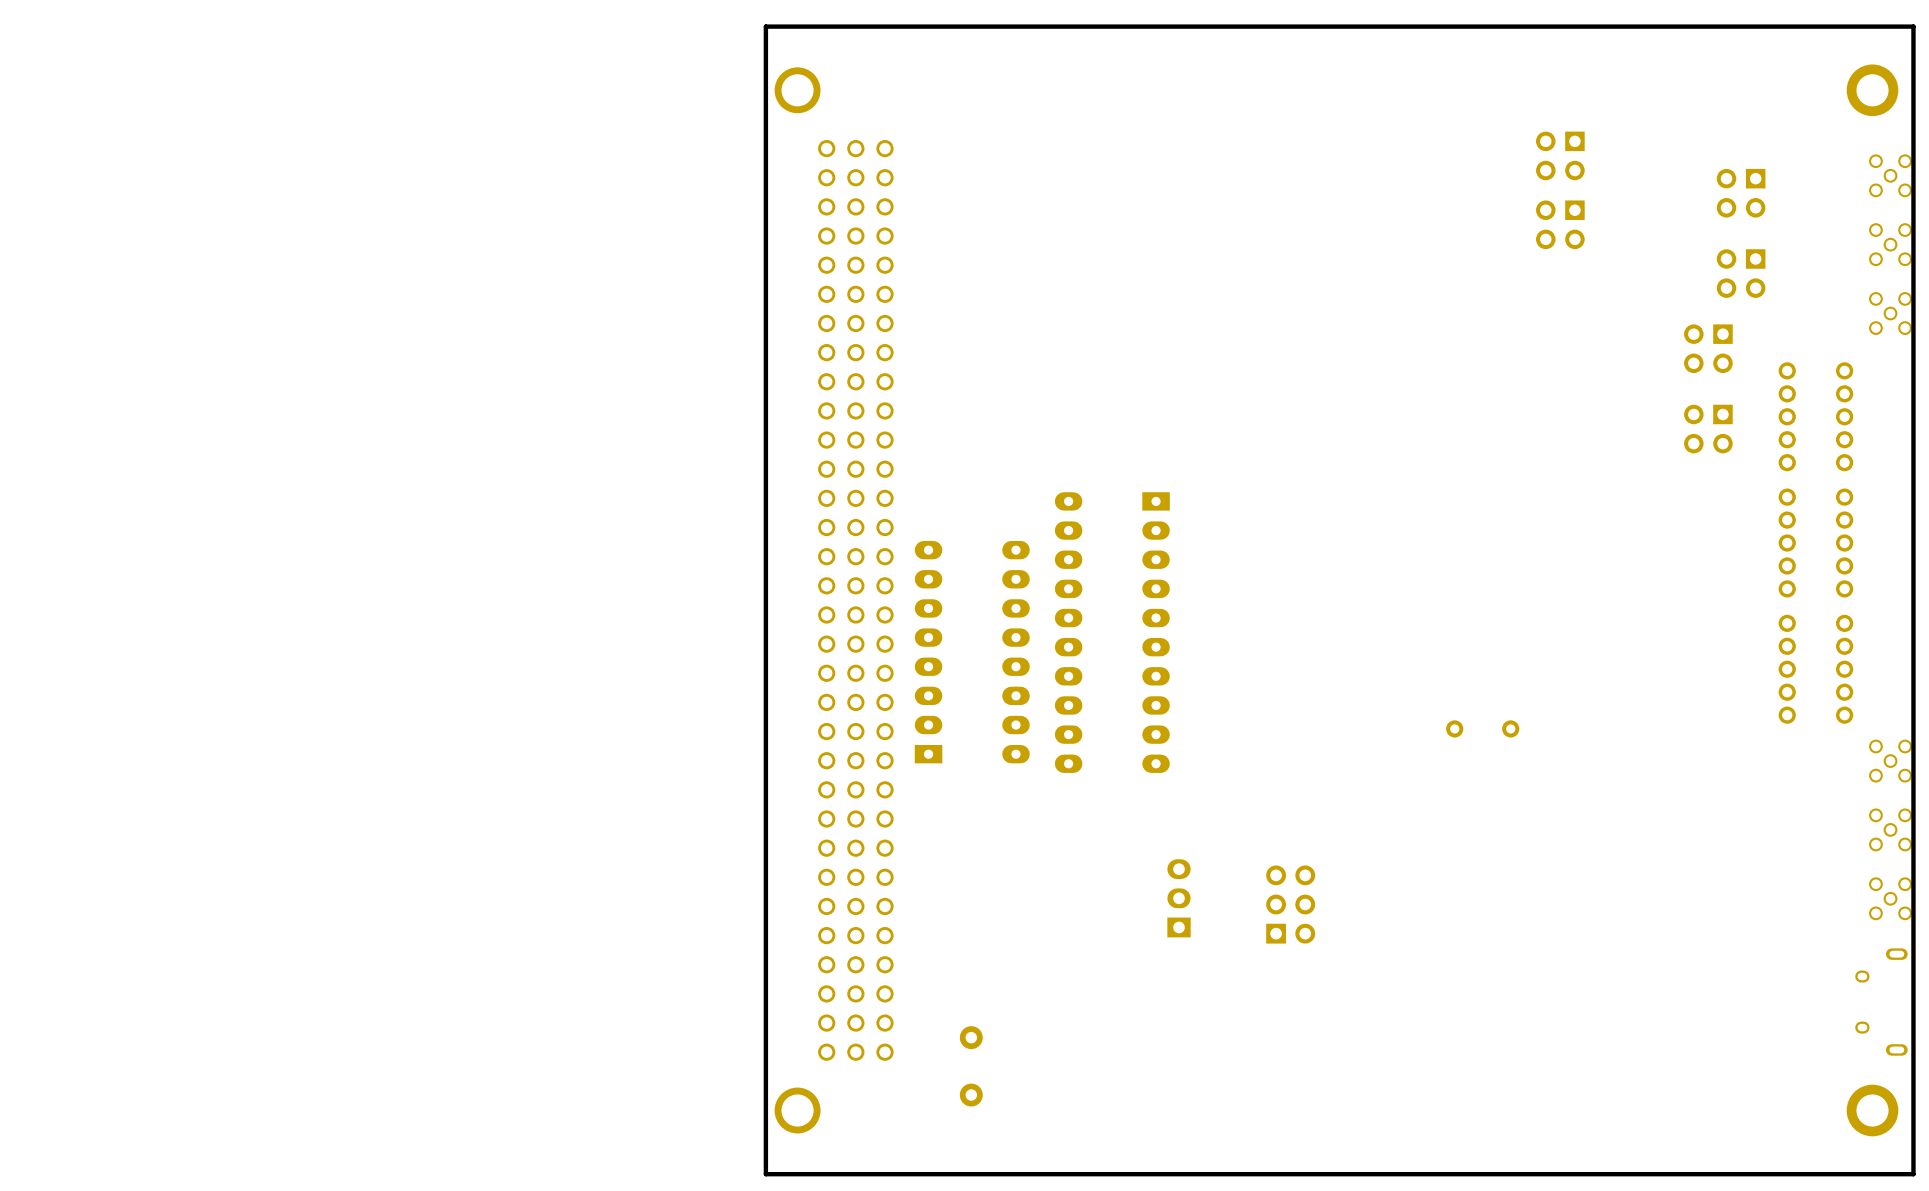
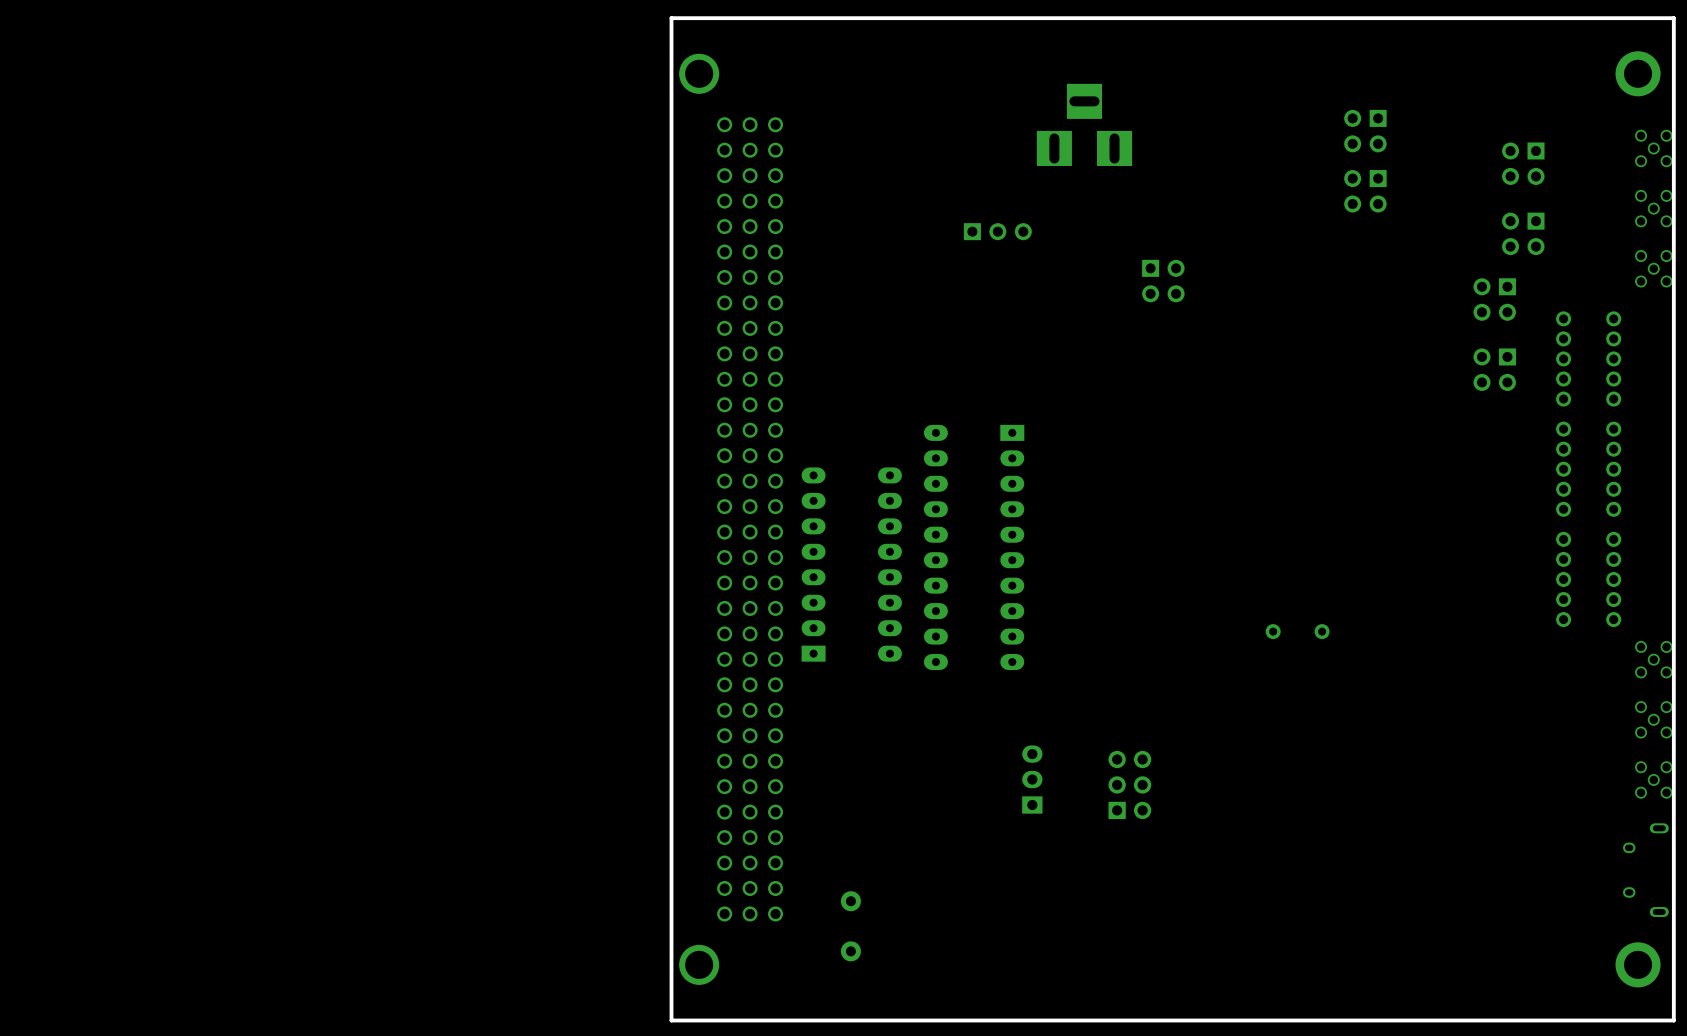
part: none -> (1084, 124)
part: none -> (997, 231)
part: none -> (1163, 281)

